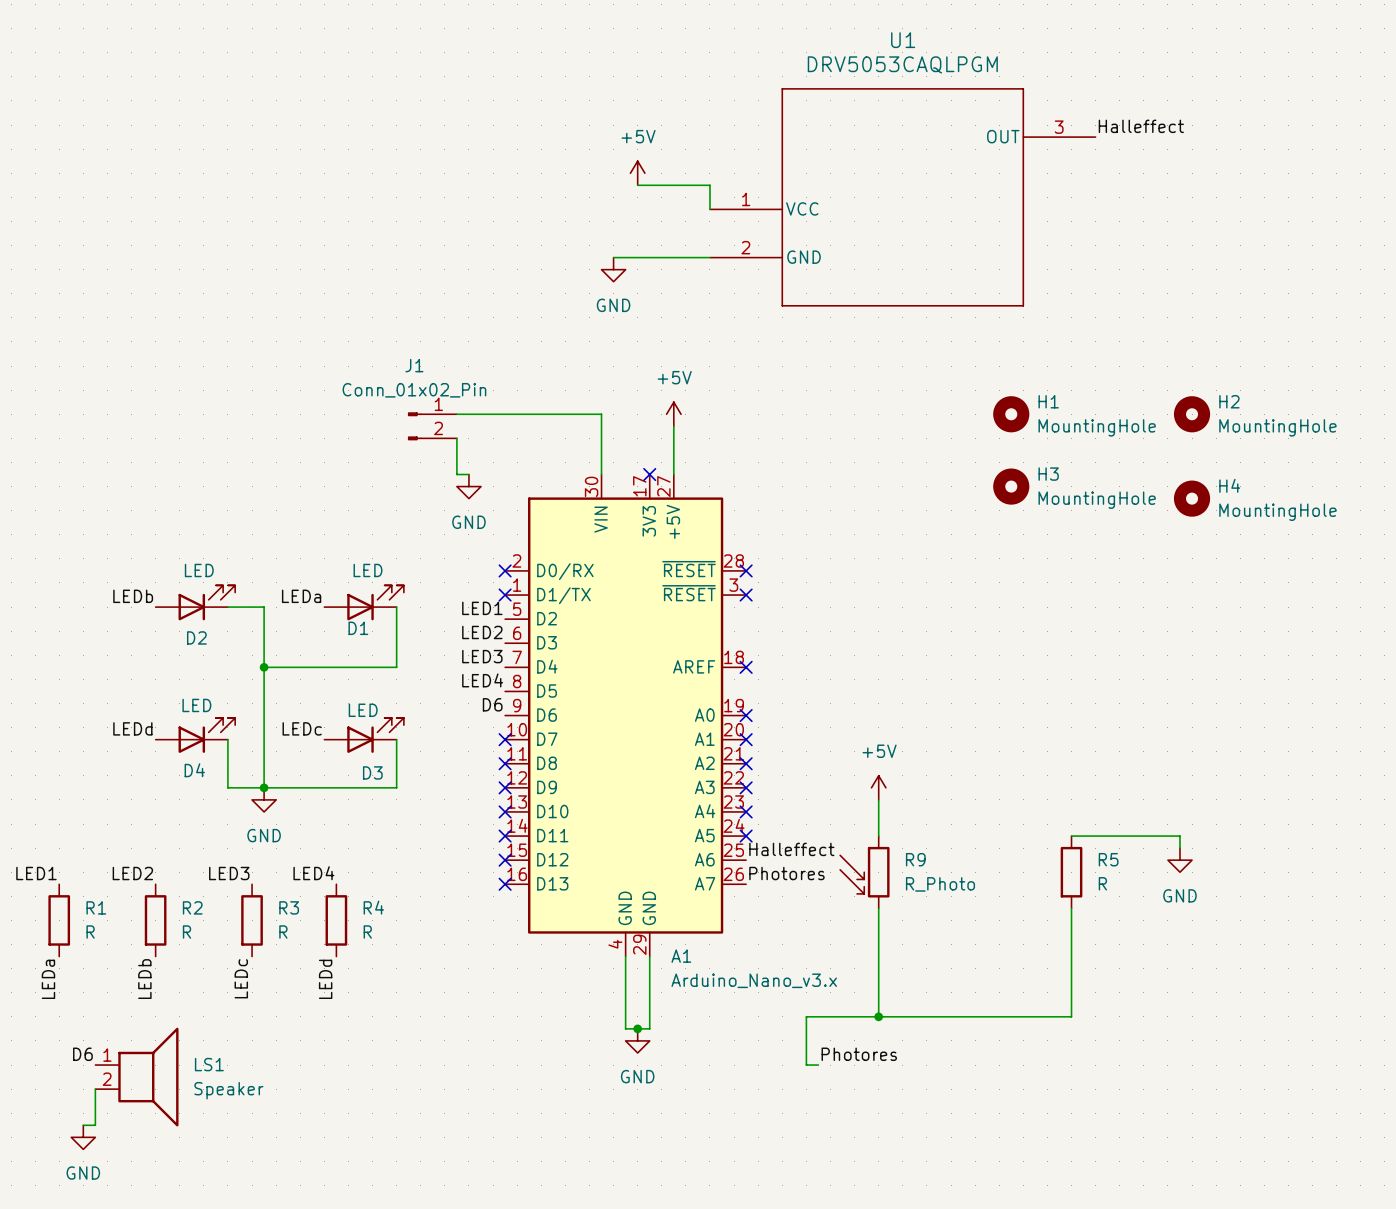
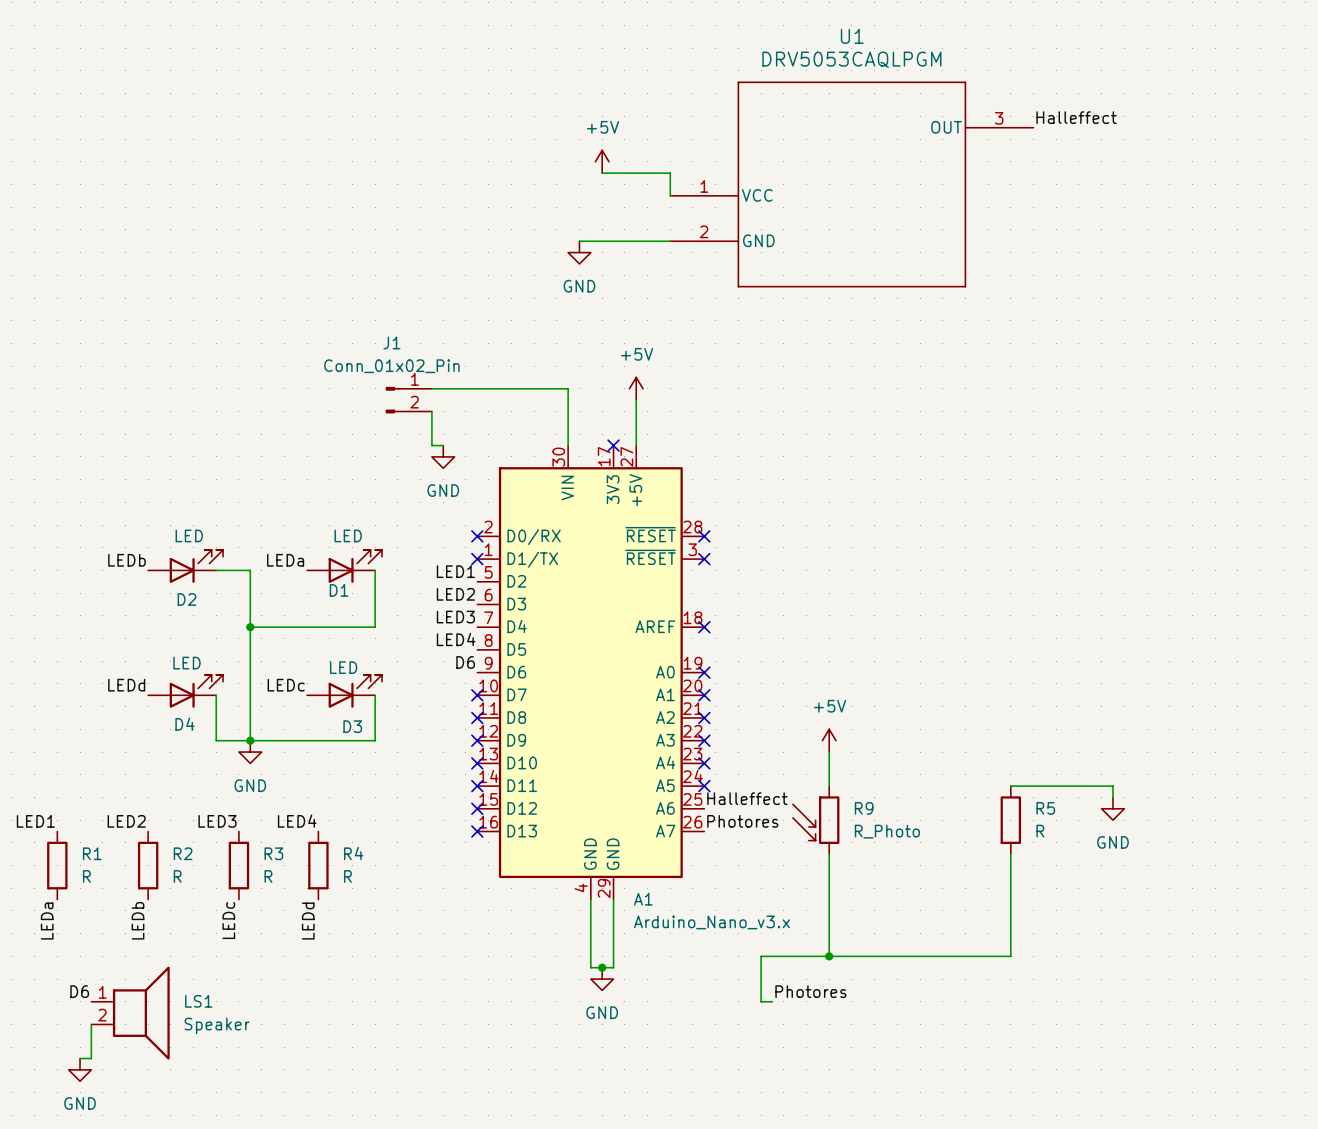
H1: MountingHole (1011, 414) -> none
H2: MountingHole (1192, 414) -> none
H3: MountingHole (1011, 486) -> none
H4: MountingHole (1192, 498) -> none

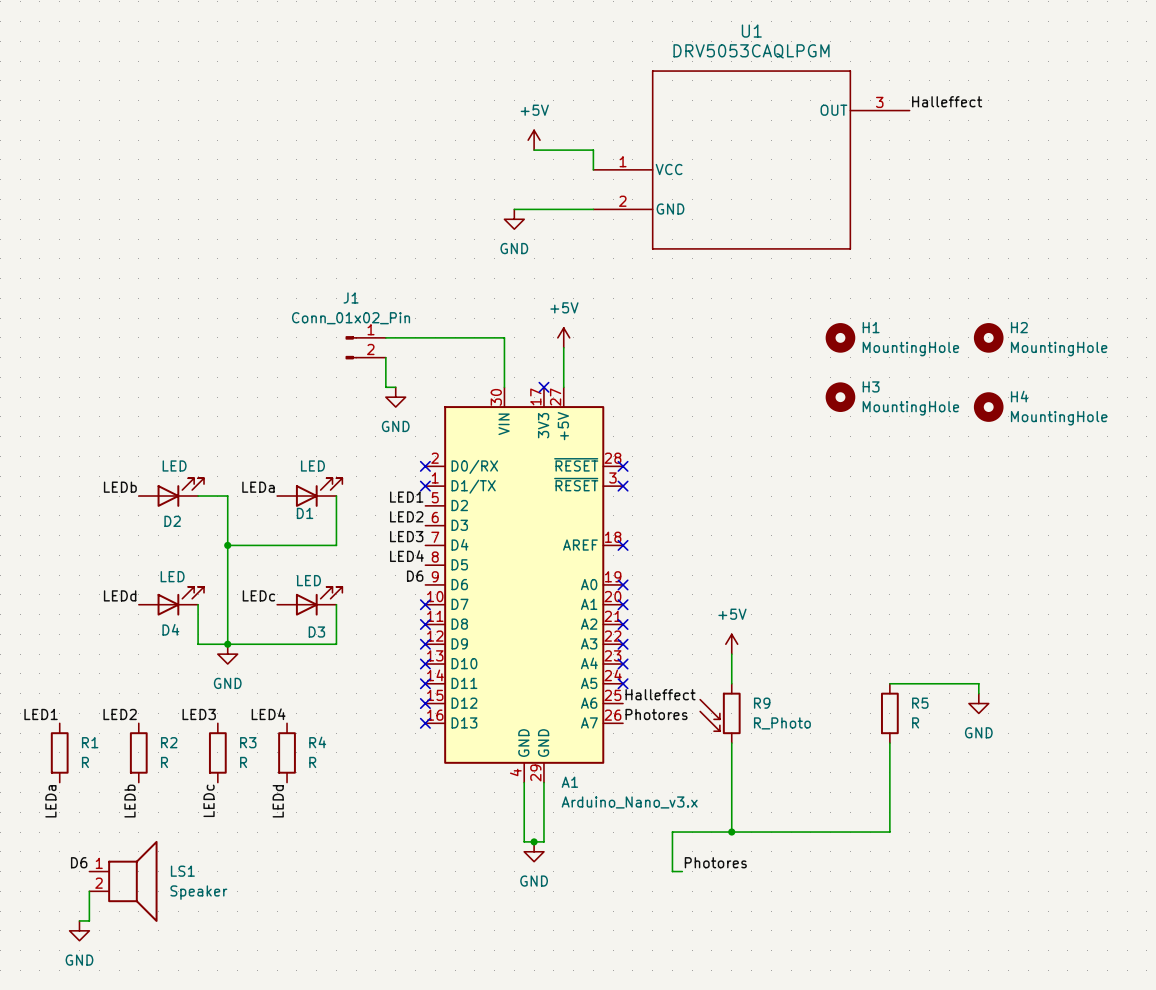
H1: none -> MountingHole (840, 337)
H2: none -> MountingHole (988, 337)
H3: none -> MountingHole (840, 397)
H4: none -> MountingHole (988, 407)

